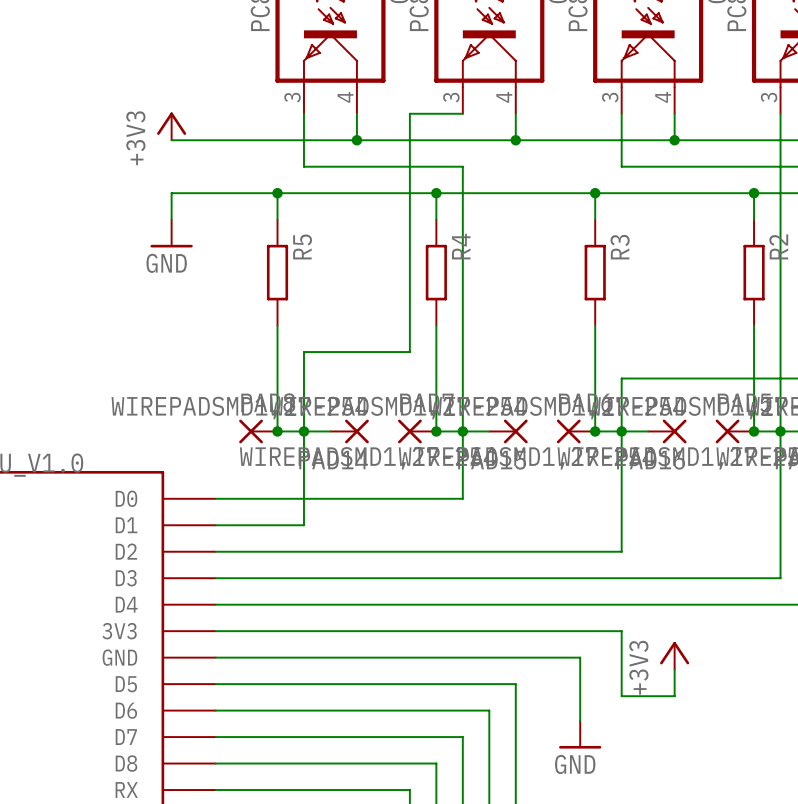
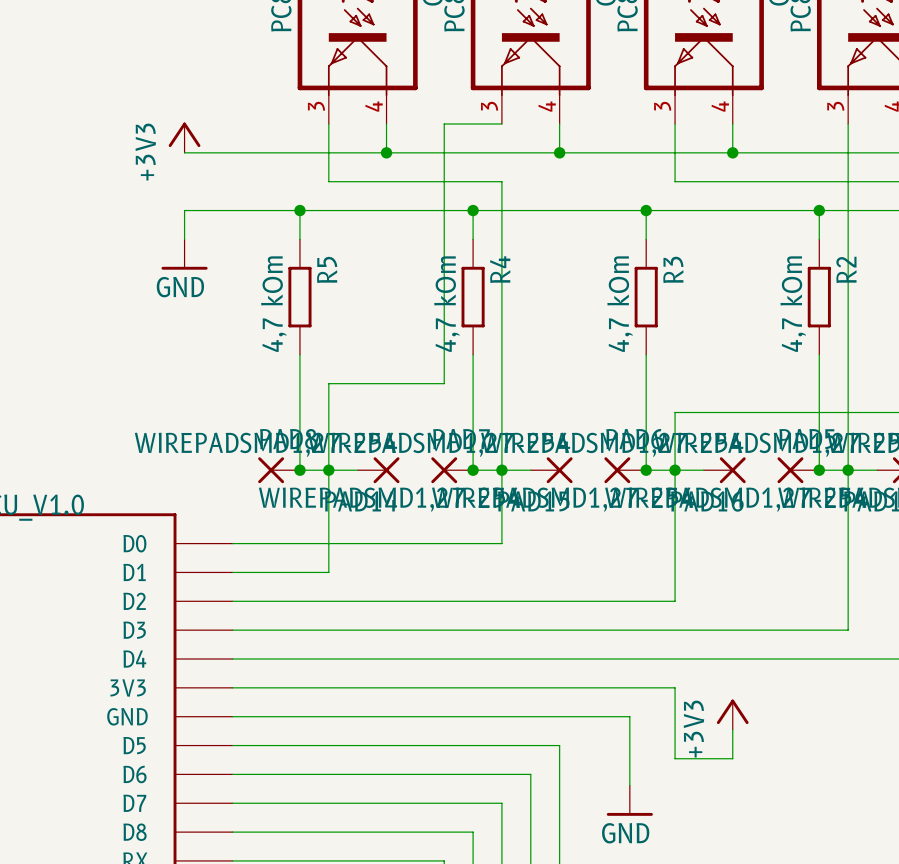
R5 value: none -> 4,7 kOm (273, 304)
R4 value: none -> 4,7 kOm (447, 304)
R3 value: none -> 4,7 kOm (620, 304)
R2 value: none -> 4,7 kOm (793, 304)

